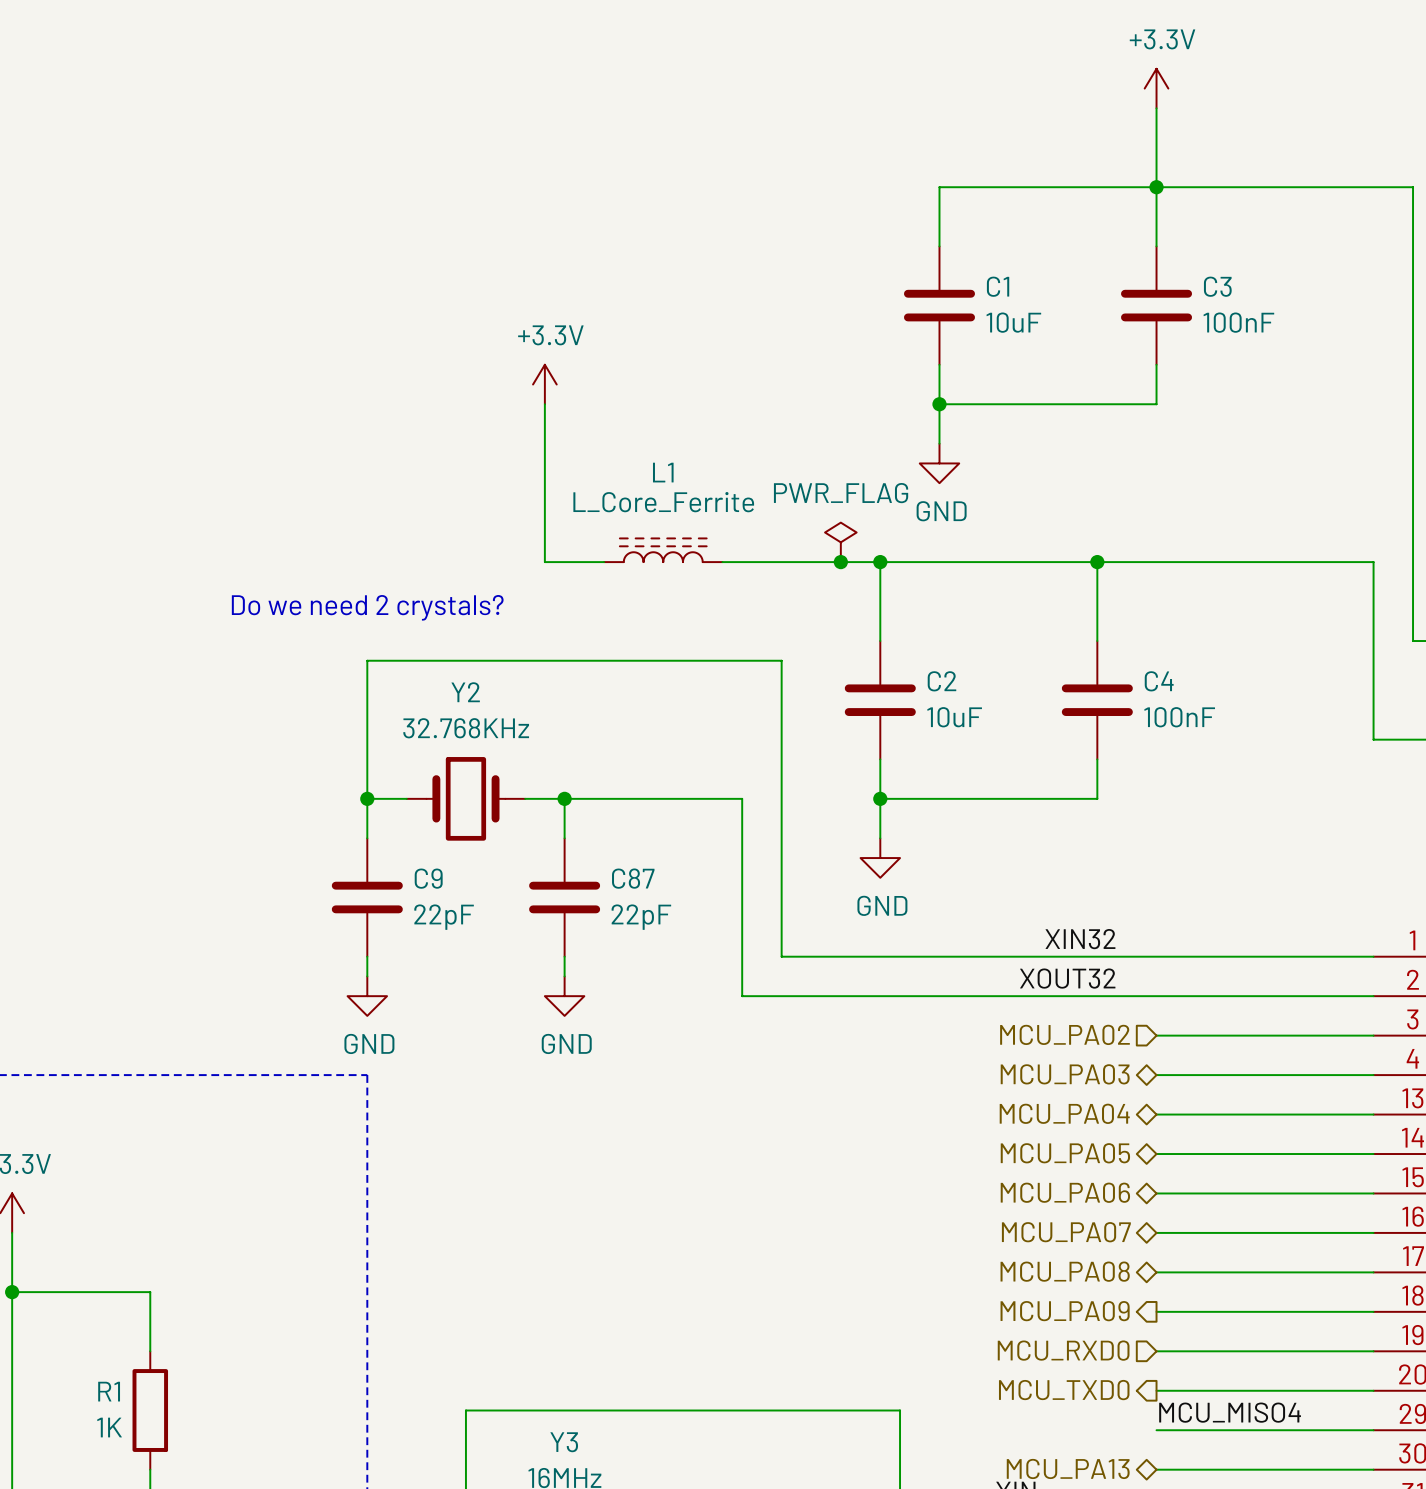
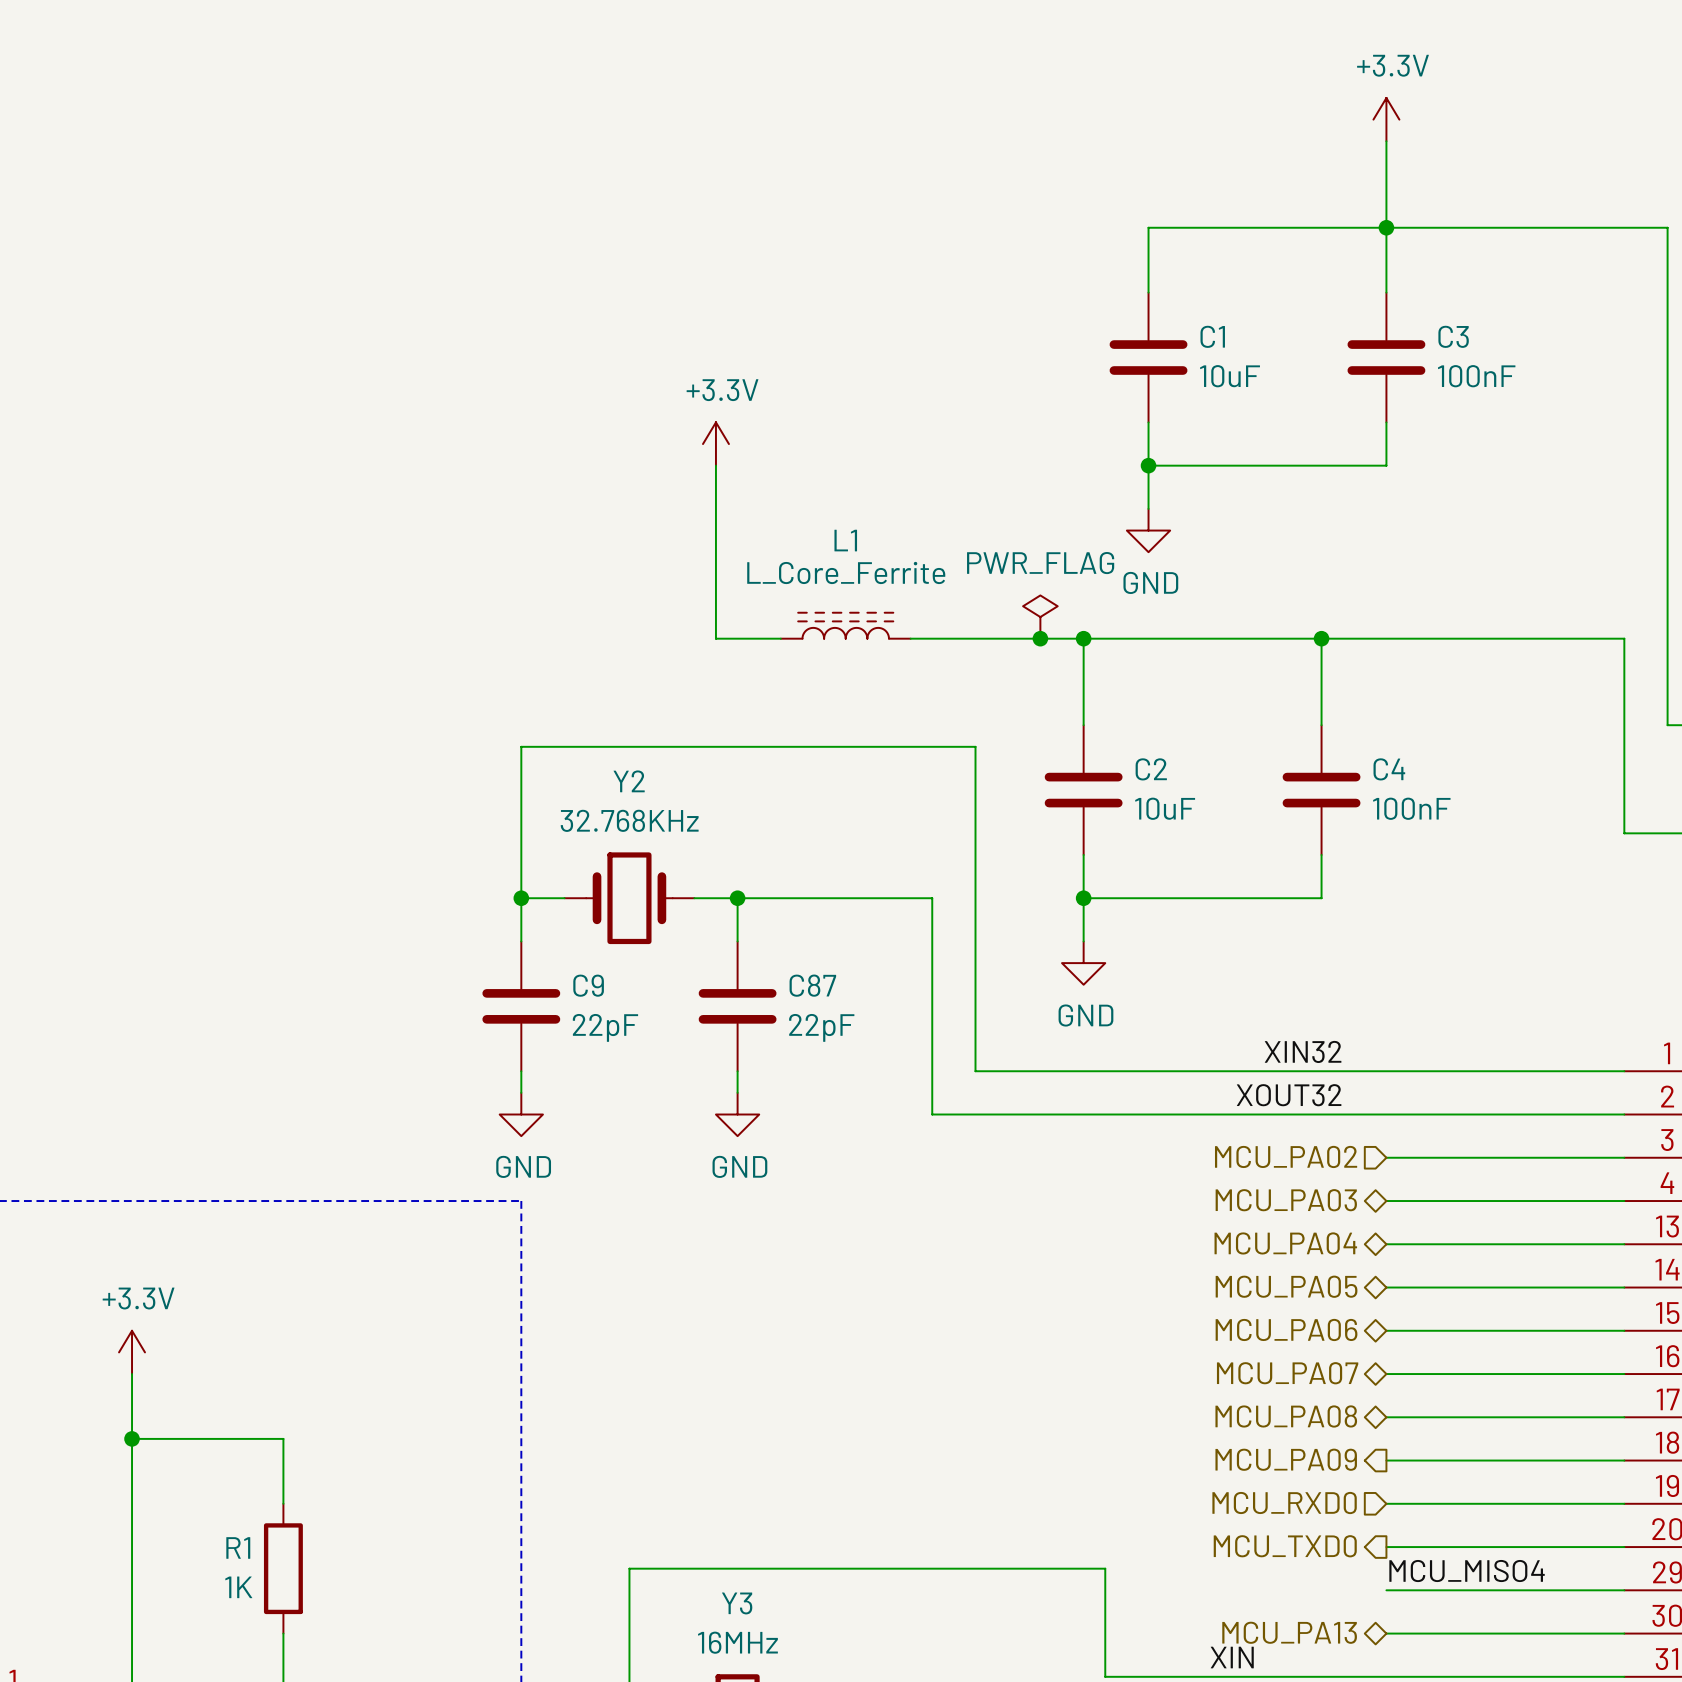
text: Do we need 2 crystals? (367, 607) -> none

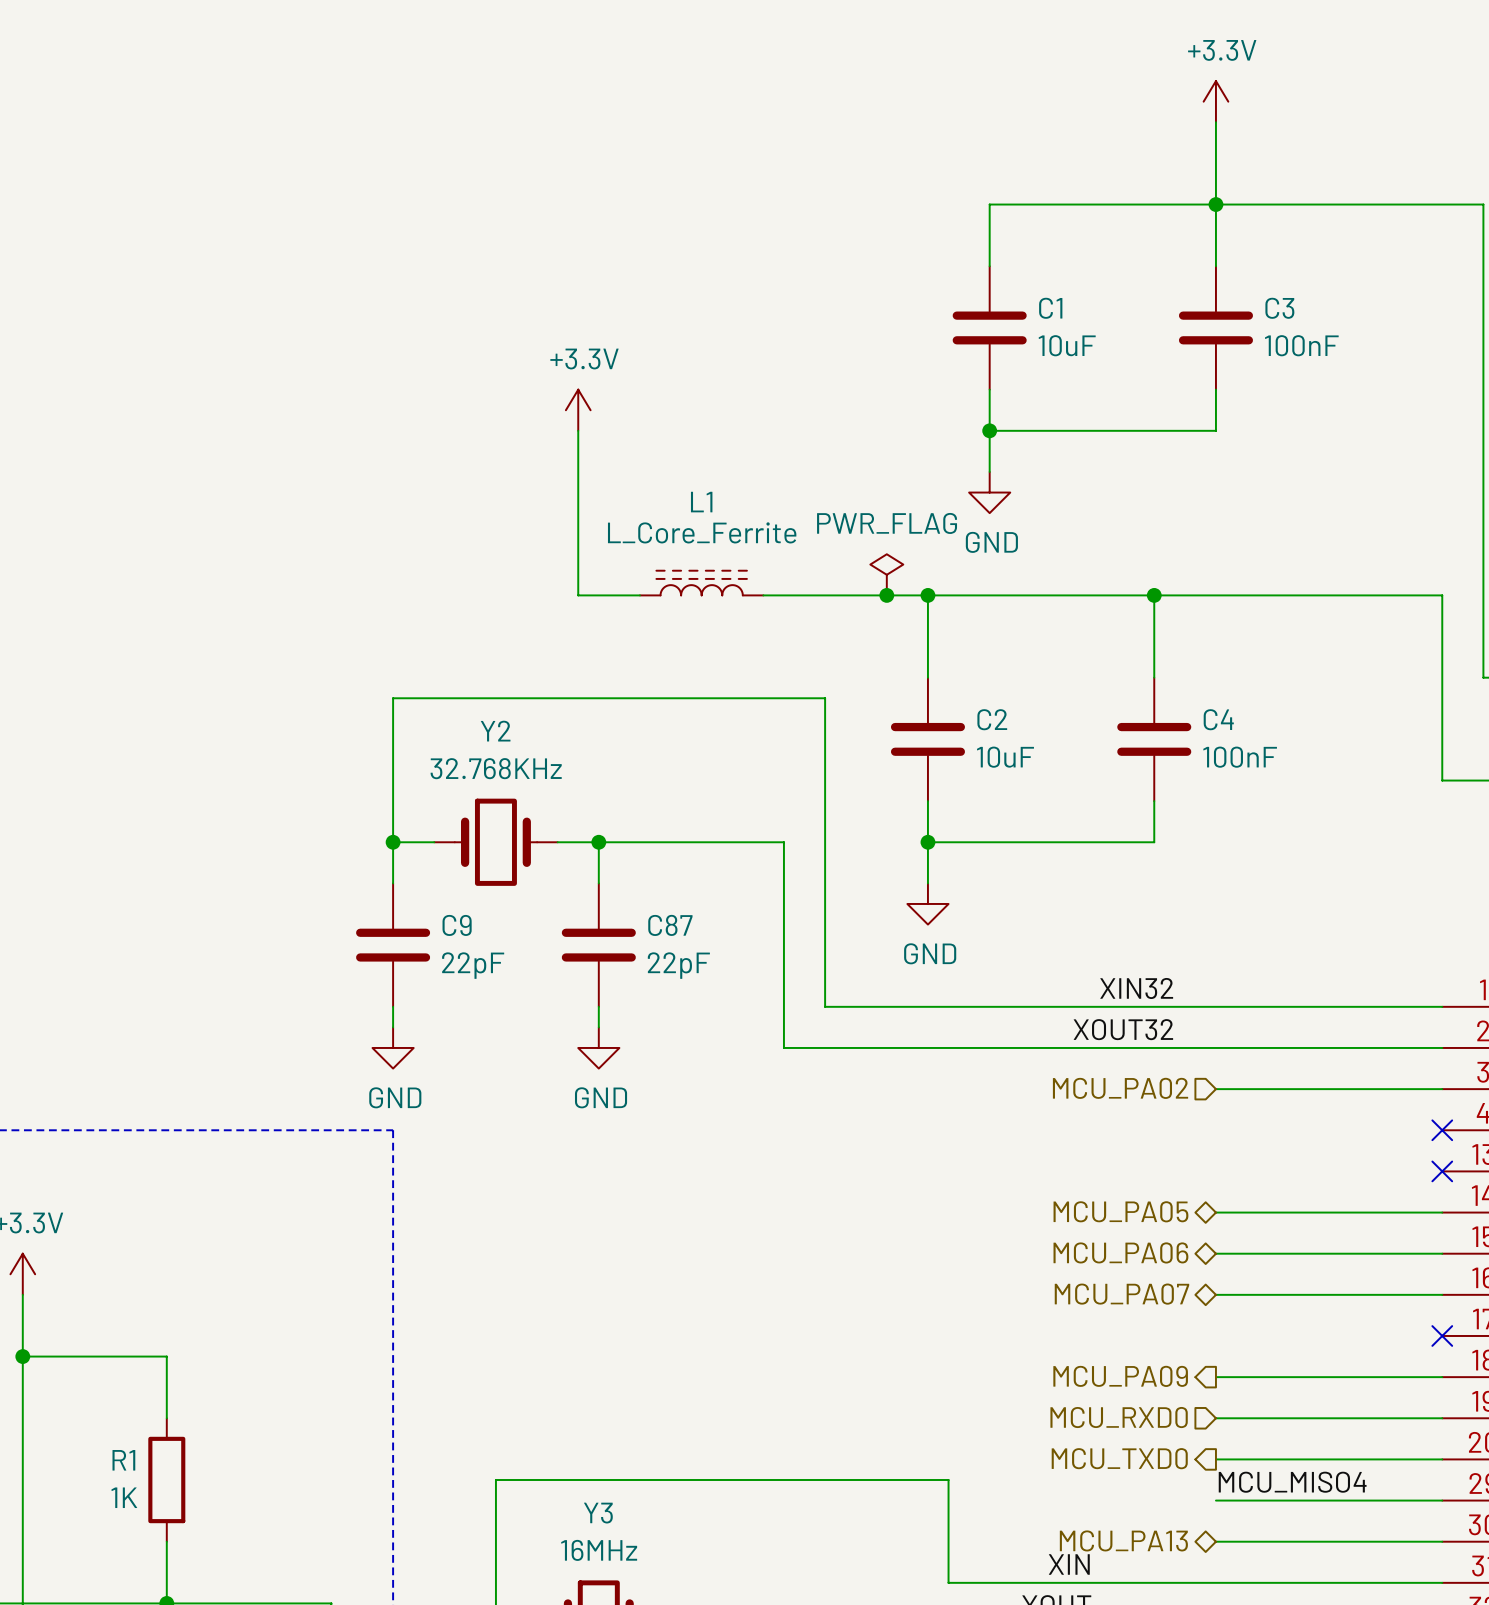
hierarchical label: MCU_PA03 (1286, 1200) -> none
wire: (1386, 1201) (1624, 1201) -> none
no-connect mark: none -> (1442, 1130)
hierarchical label: MCU_PA04 (1285, 1243) -> none
wire: (1386, 1244) (1624, 1244) -> none
no-connect mark: none -> (1442, 1171)
hierarchical label: MCU_PA08 (1286, 1416) -> none
wire: (1386, 1417) (1624, 1417) -> none
no-connect mark: none -> (1442, 1335)

